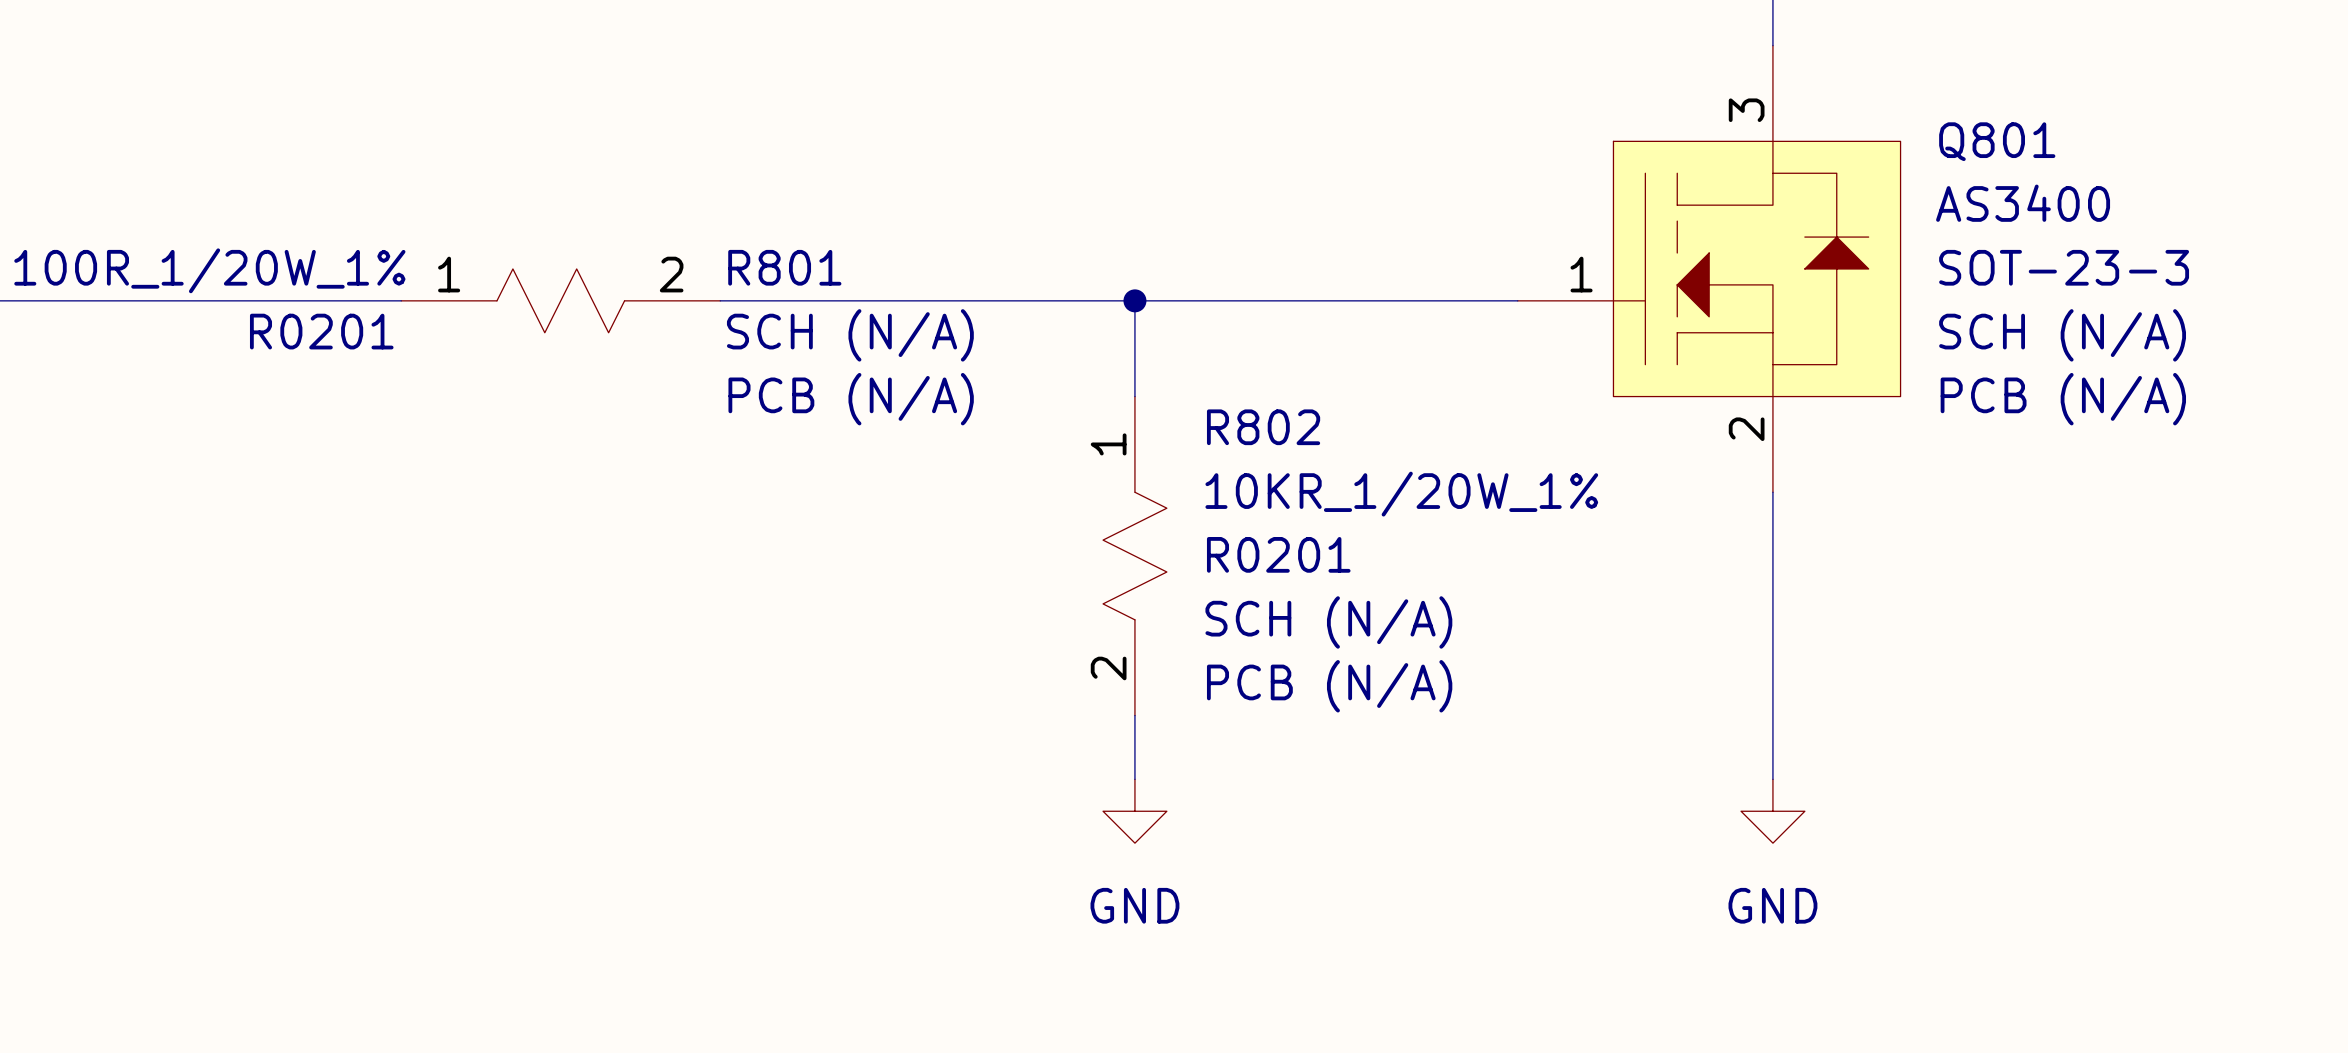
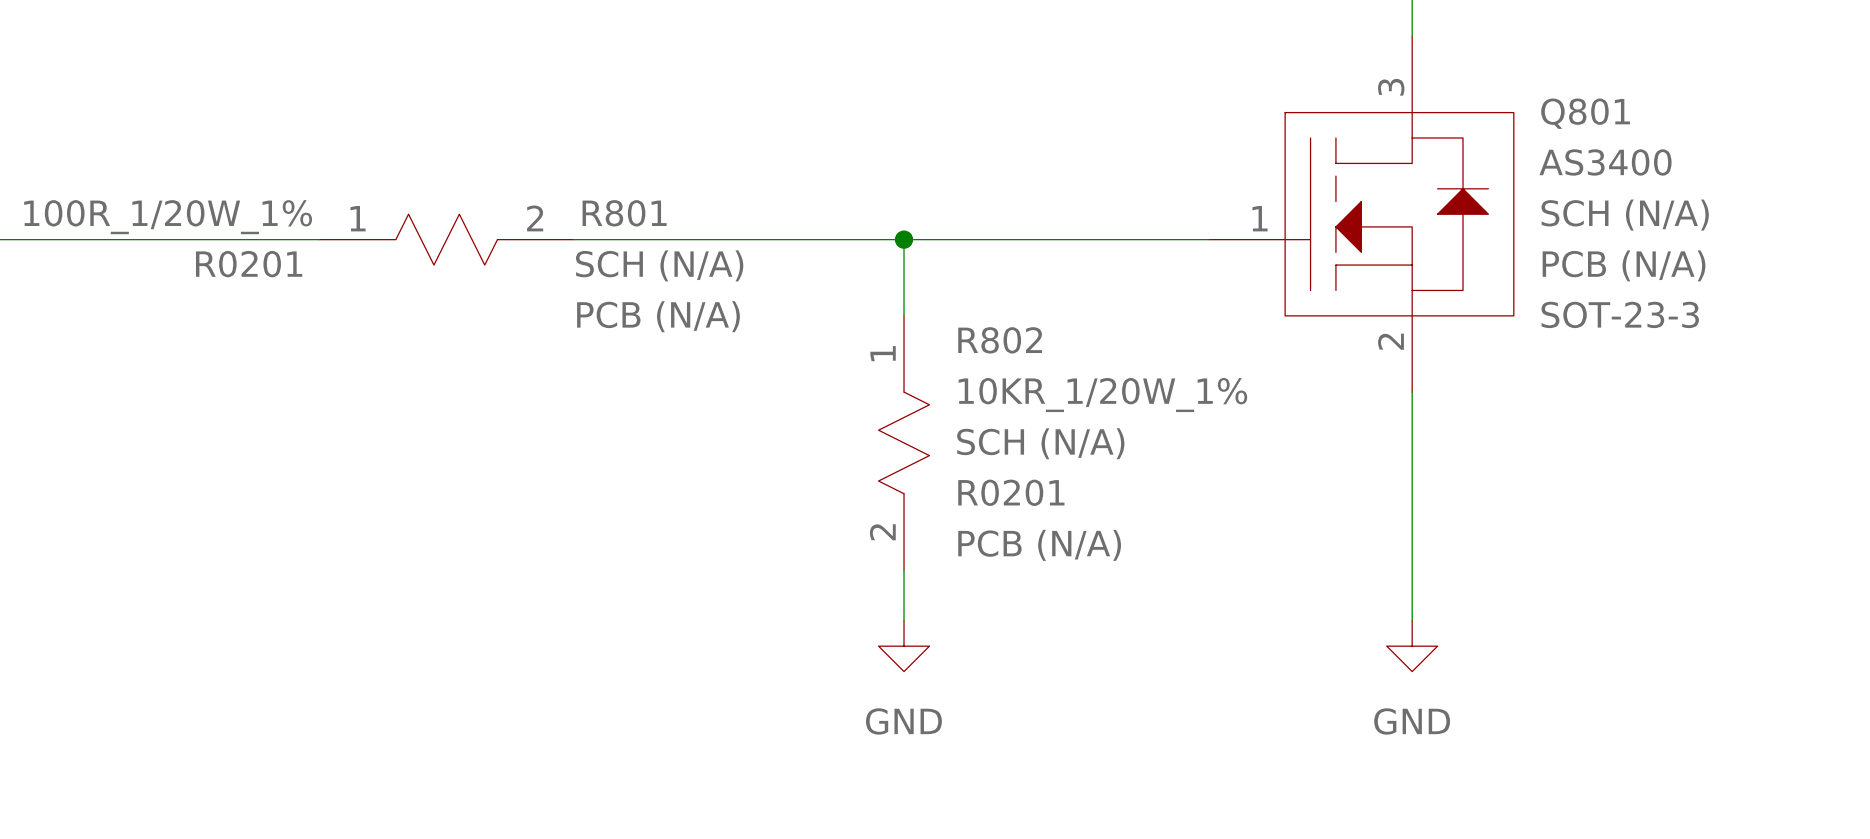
Q801 text position: SOT-23-3 (2064, 267) -> SOT-23-3 (1620, 314)
Q801 text position: SCH (N/A) (2062, 335) -> SCH (N/A) (1625, 215)
Q801 text position: PCB (N/A) (2063, 399) -> PCB (N/A) (1624, 265)
R802 text position: R0201 (1278, 554) -> R0201 (1011, 492)
R802 text position: SCH (N/A) (1328, 622) -> SCH (N/A) (1040, 443)

